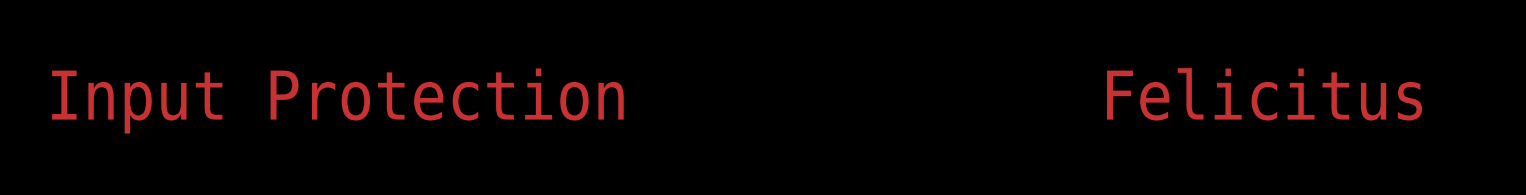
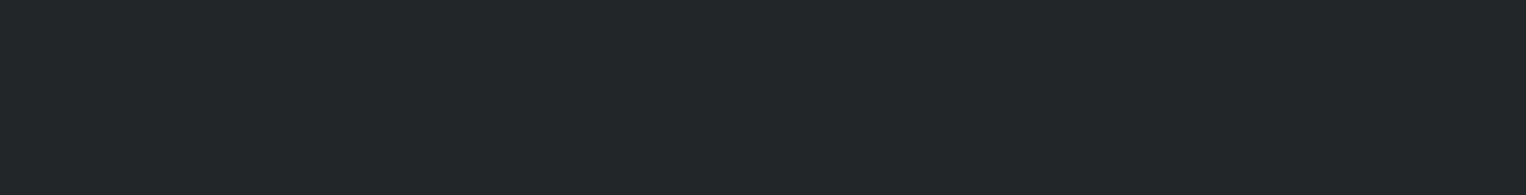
text: Felicitus (1264, 94) -> none
text: Input Protection (337, 101) -> none

